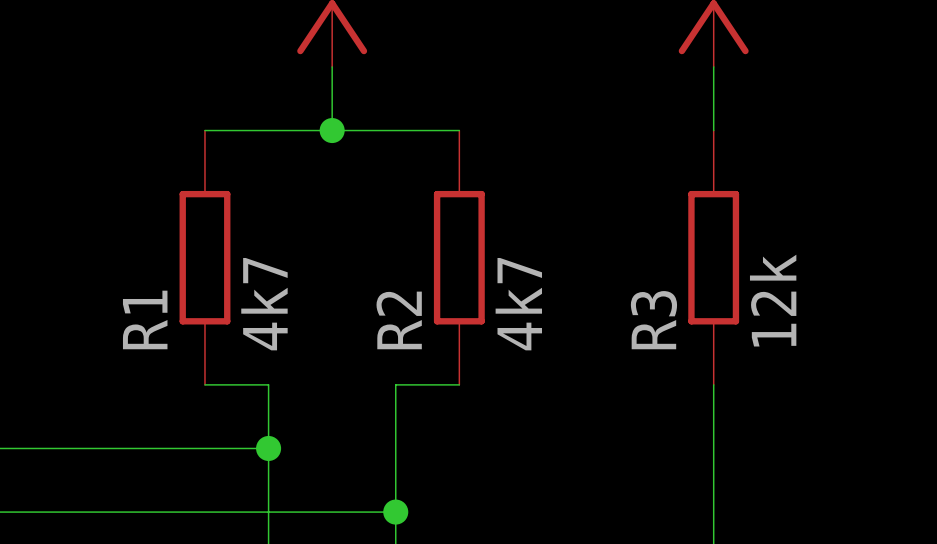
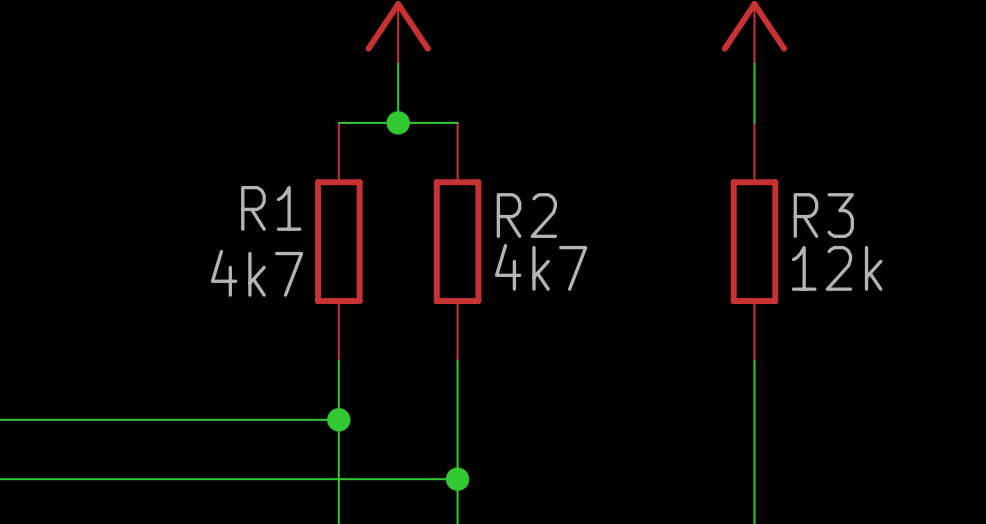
wire: (204, 130) (268, 130) -> none
wire: (395, 130) (459, 130) -> none
R1 position: (204, 257) -> (338, 241)
R2 position: (459, 257) -> (457, 241)
R3 value rotation: 0° (773, 300) -> 90° clockwise (837, 268)
R1 value rotation: 0° (264, 304) -> 90° clockwise (257, 273)
R2 value rotation: 0° (518, 304) -> 90° clockwise (541, 267)
R1 name rotation: 0° (145, 319) -> 90° clockwise (271, 208)
R2 name rotation: 0° (399, 320) -> 90° clockwise (526, 215)
R2 name position: R2 (399, 320) -> R2 (526, 215)
R3 name rotation: 0° (653, 320) -> 90° clockwise (823, 215)
R3 name position: R3 (653, 320) -> R3 (823, 215)
wire: (204, 384) (268, 384) -> none
wire: (395, 384) (459, 384) -> none

